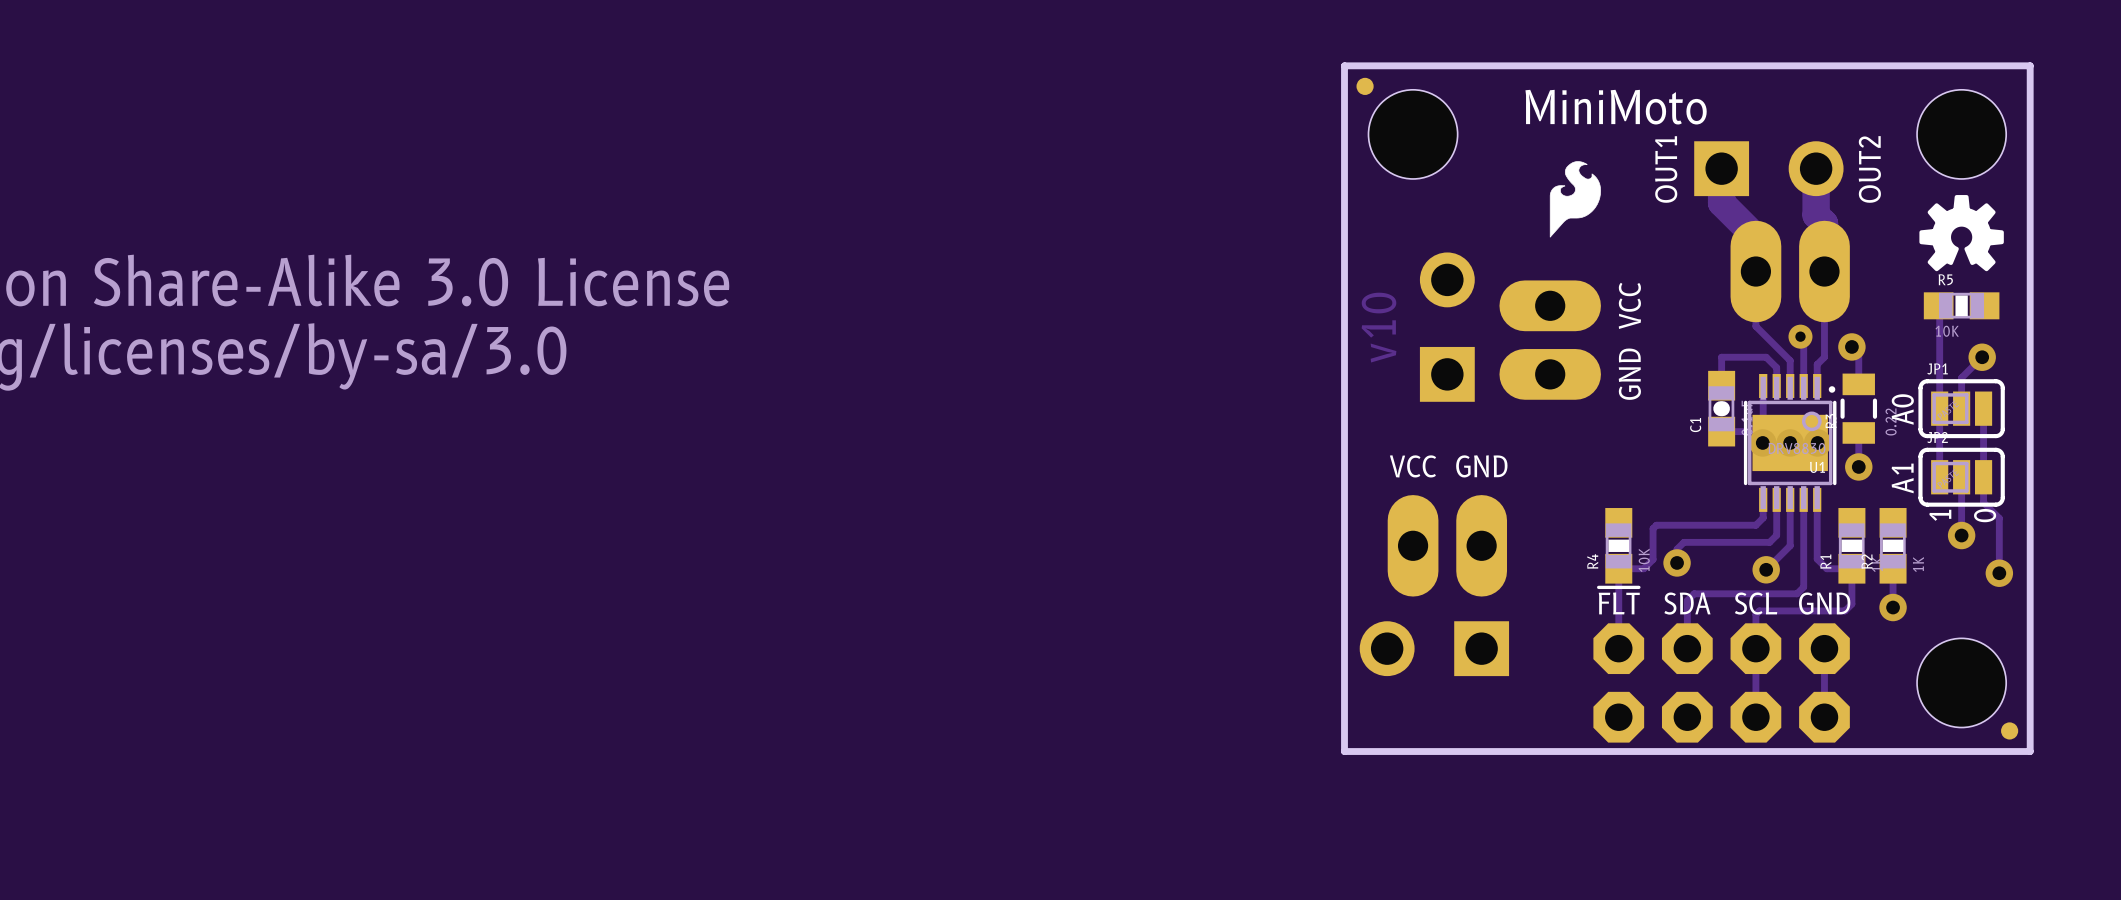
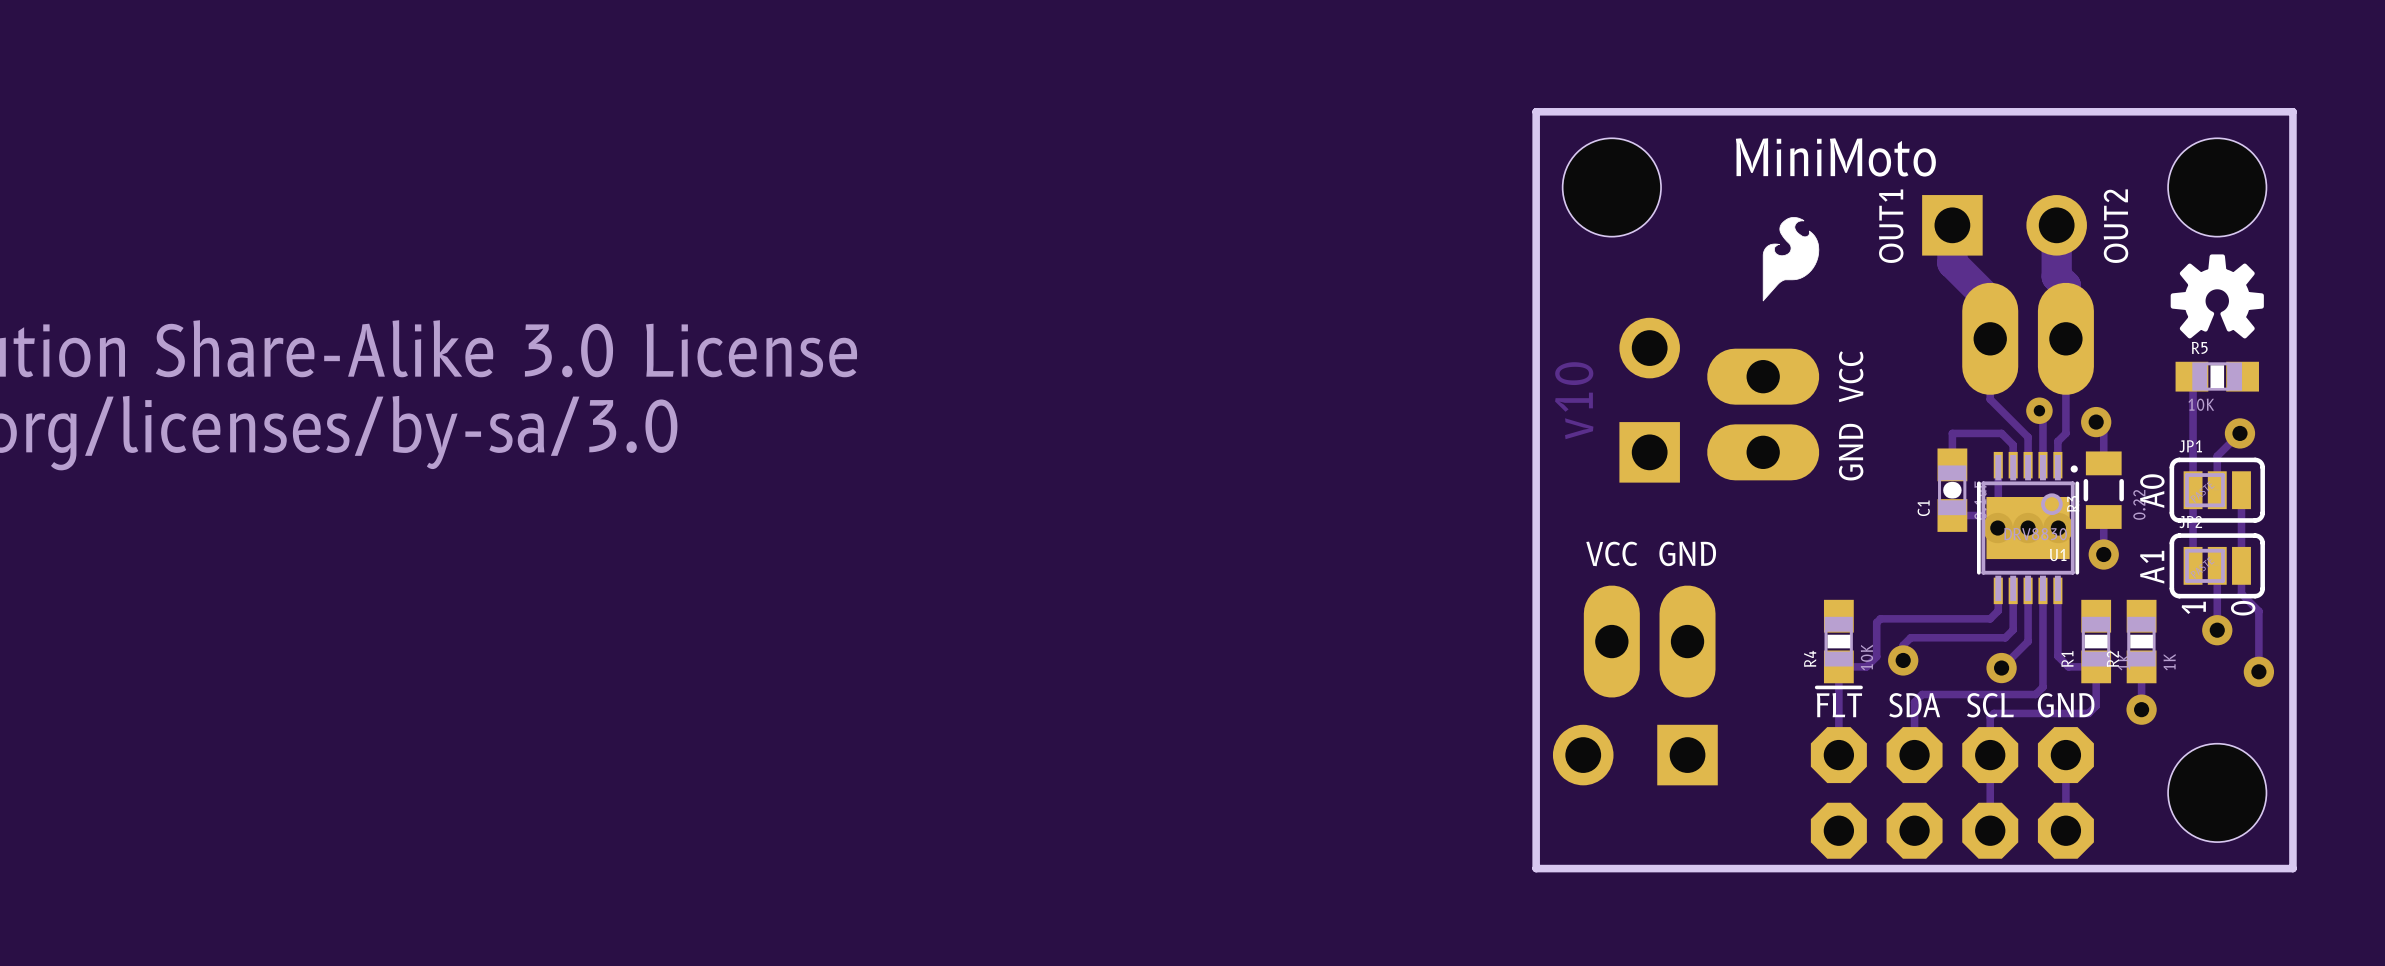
part: (1365, 86) -> none
part: (2009, 730) -> none

